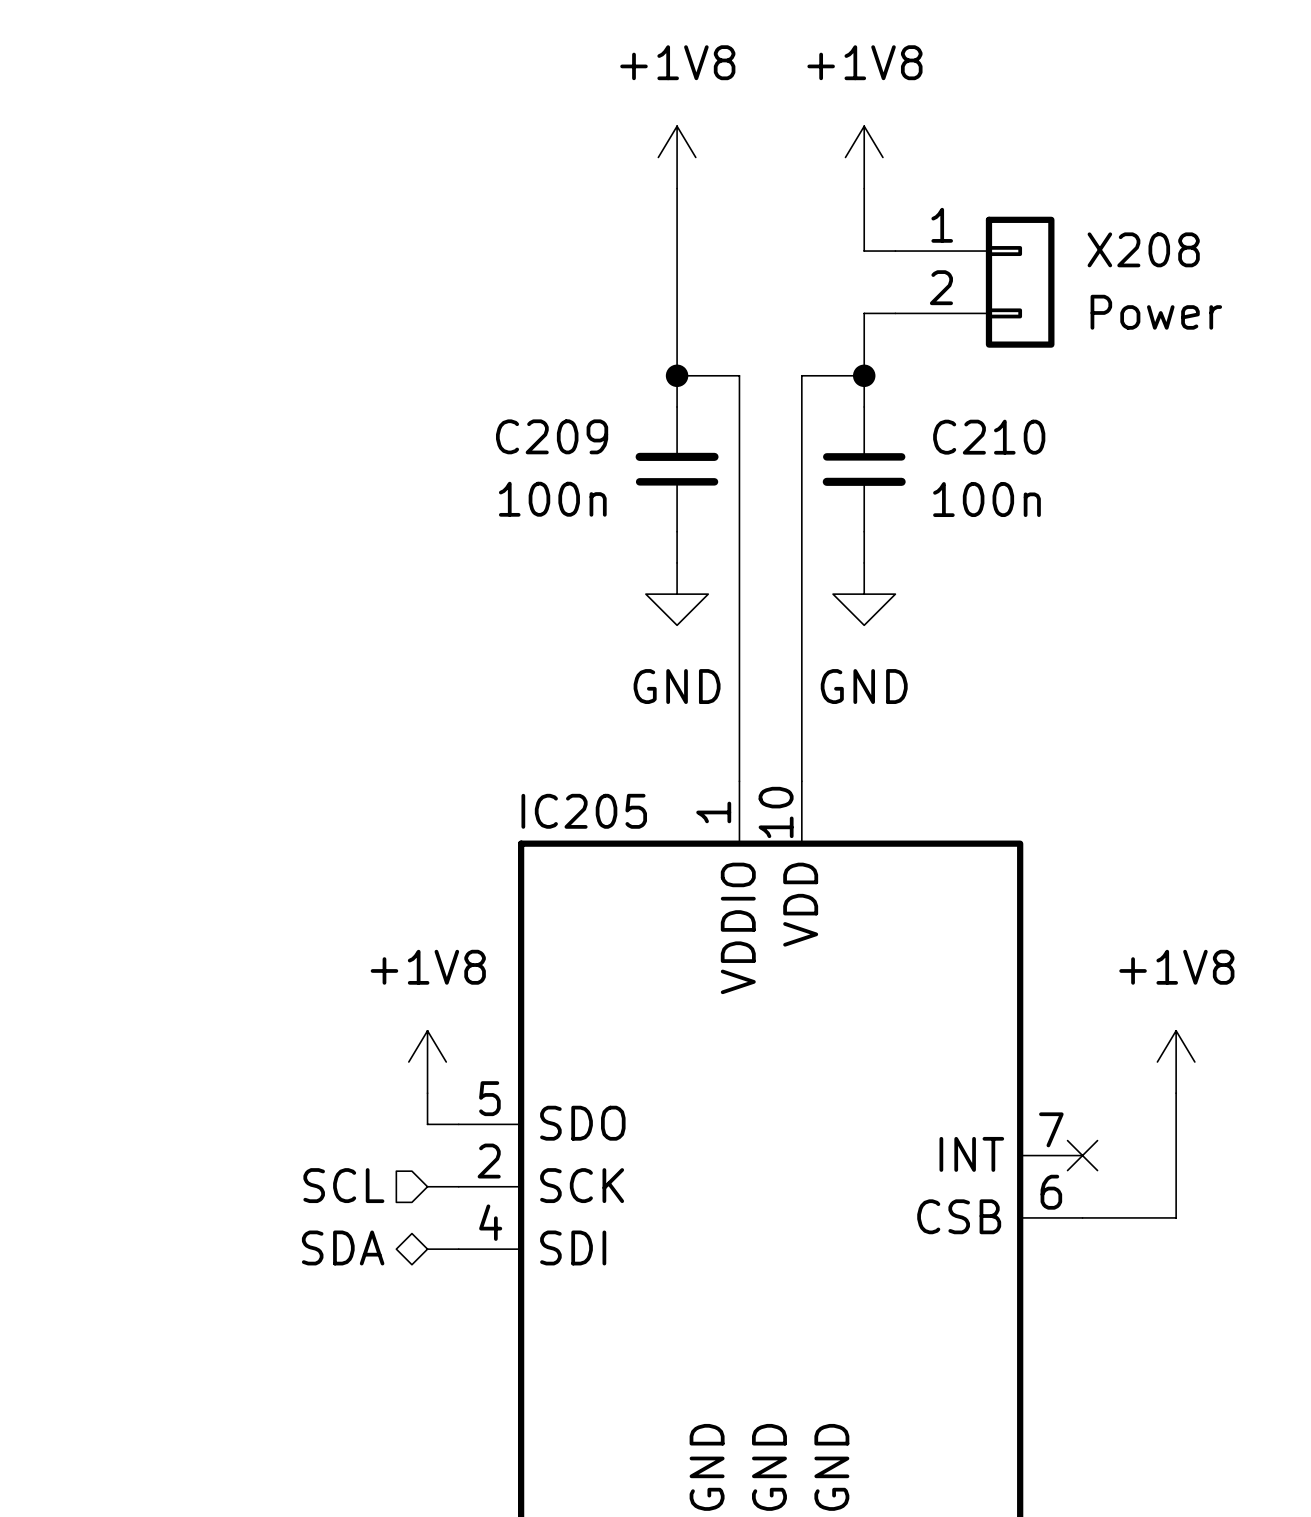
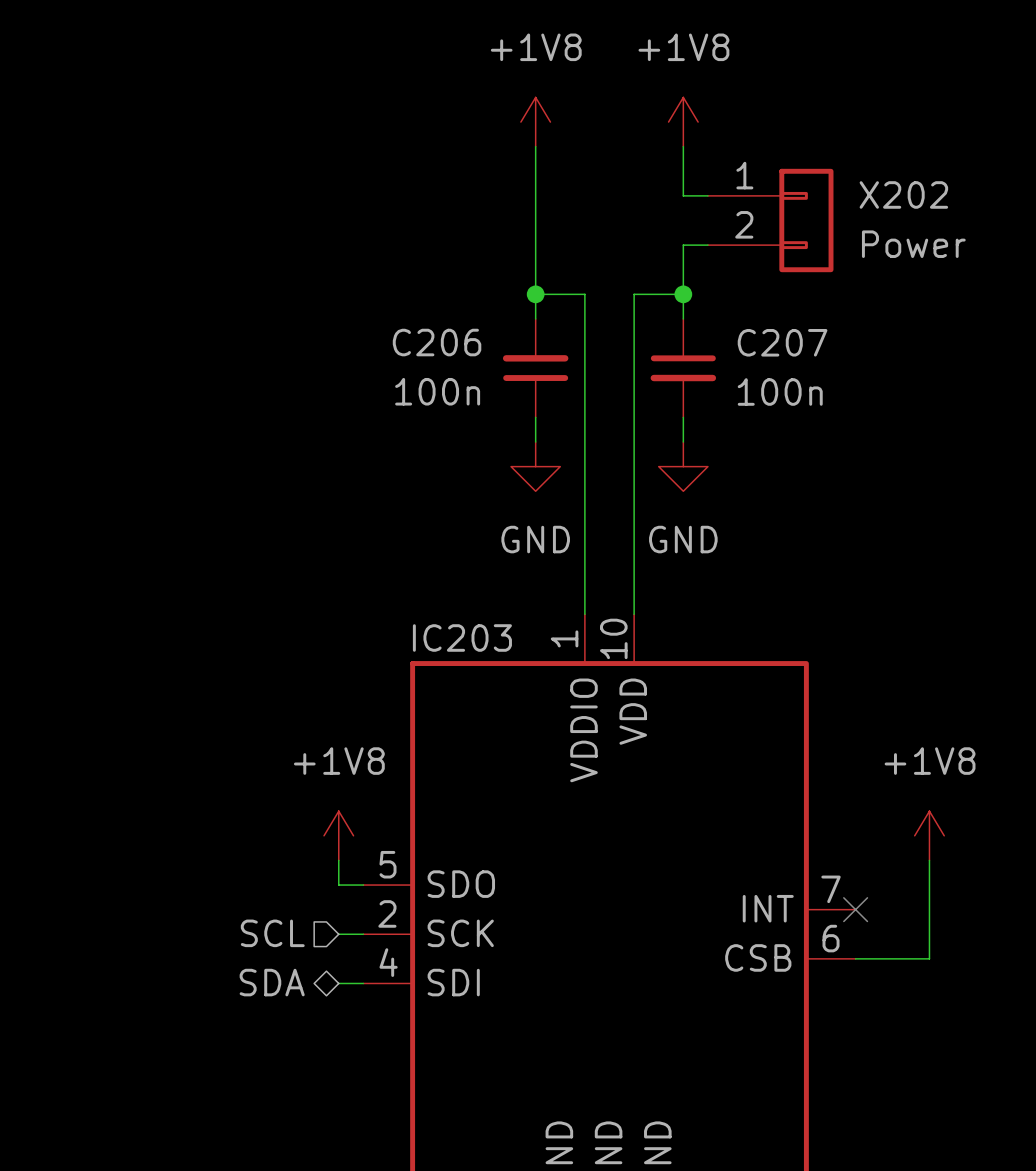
X208 name: X208 (1143, 249) -> X202 (903, 194)
C209 name: C209 (552, 436) -> C206 (437, 342)
C210 name: C210 (989, 437) -> C207 (782, 342)
IC205 name: IC205 (584, 811) -> IC203 (462, 637)

